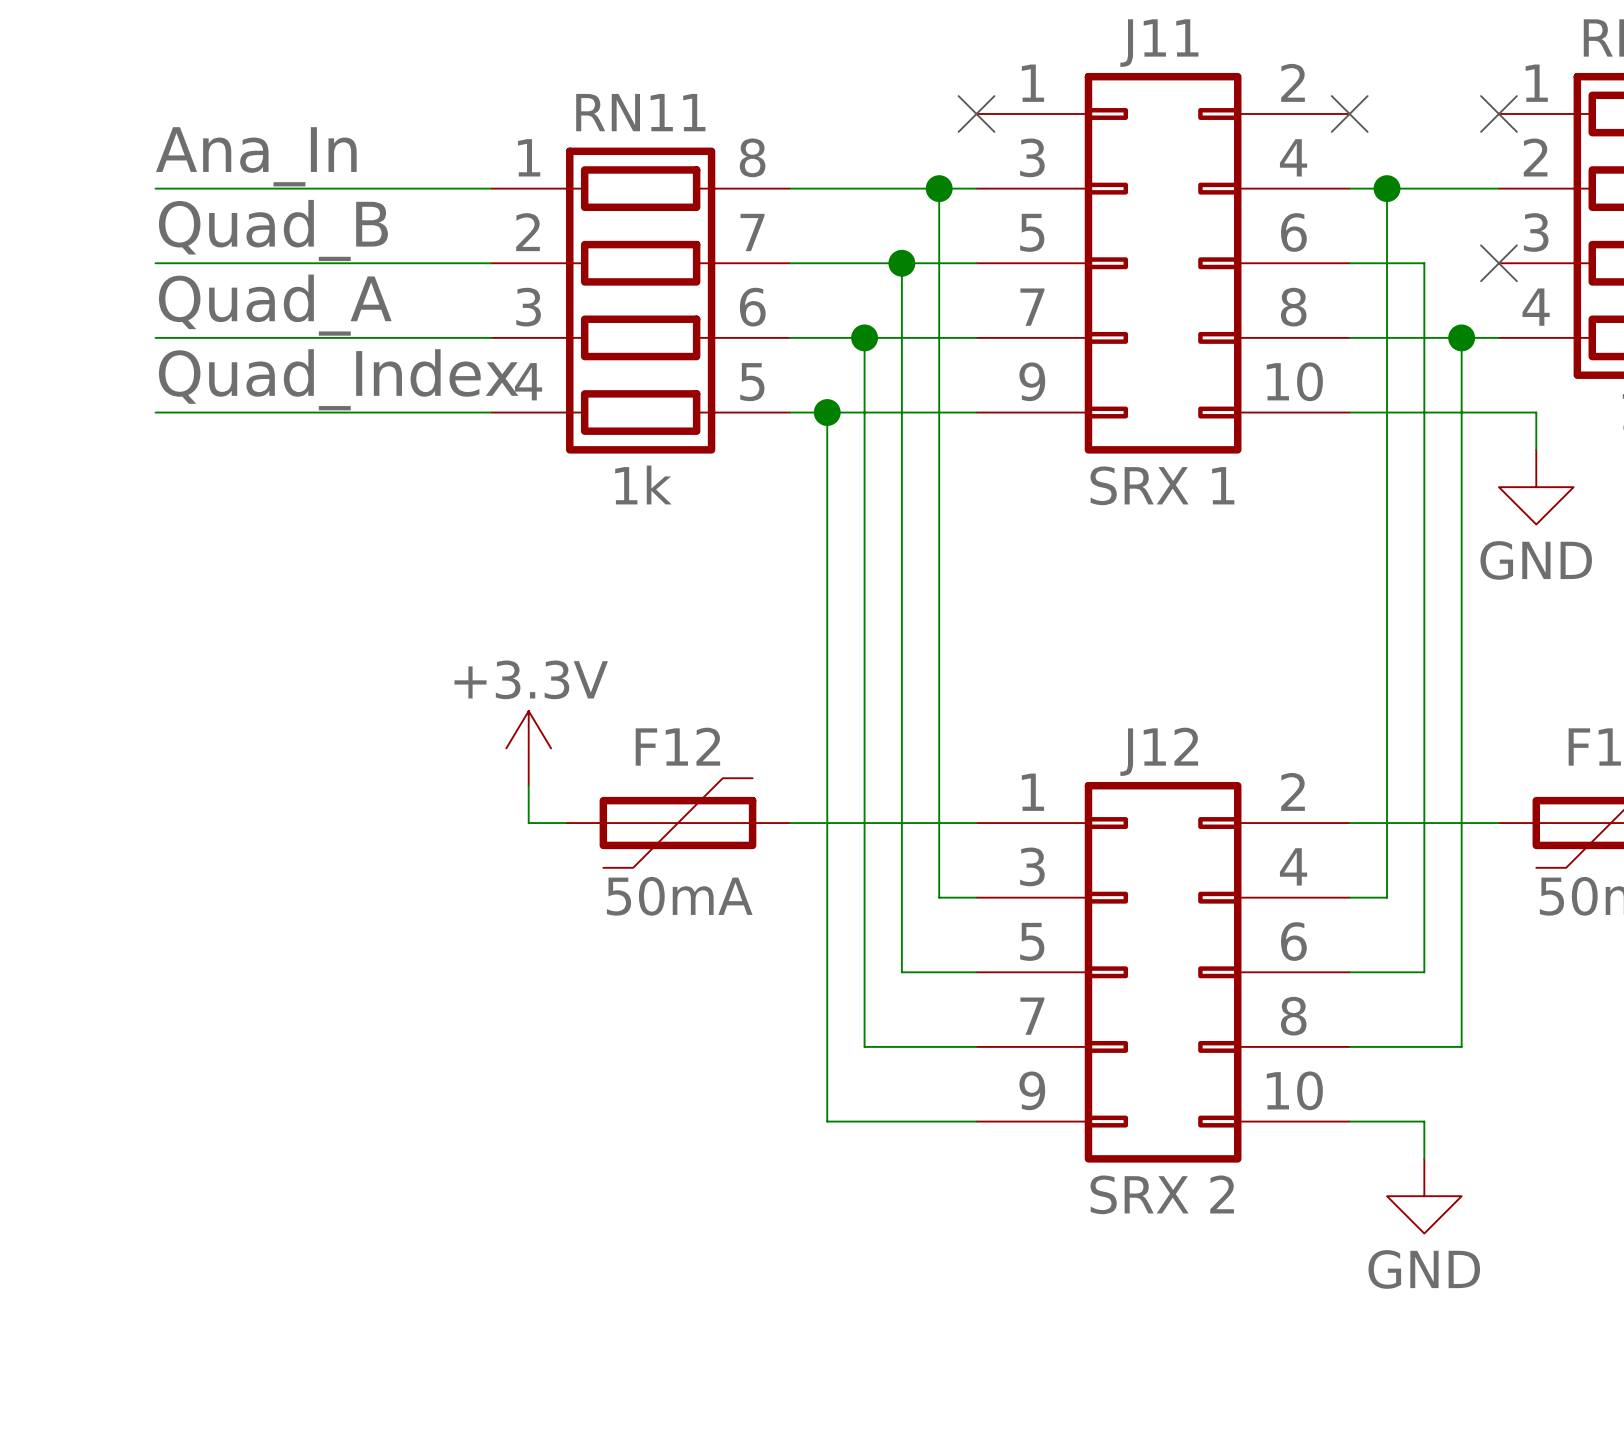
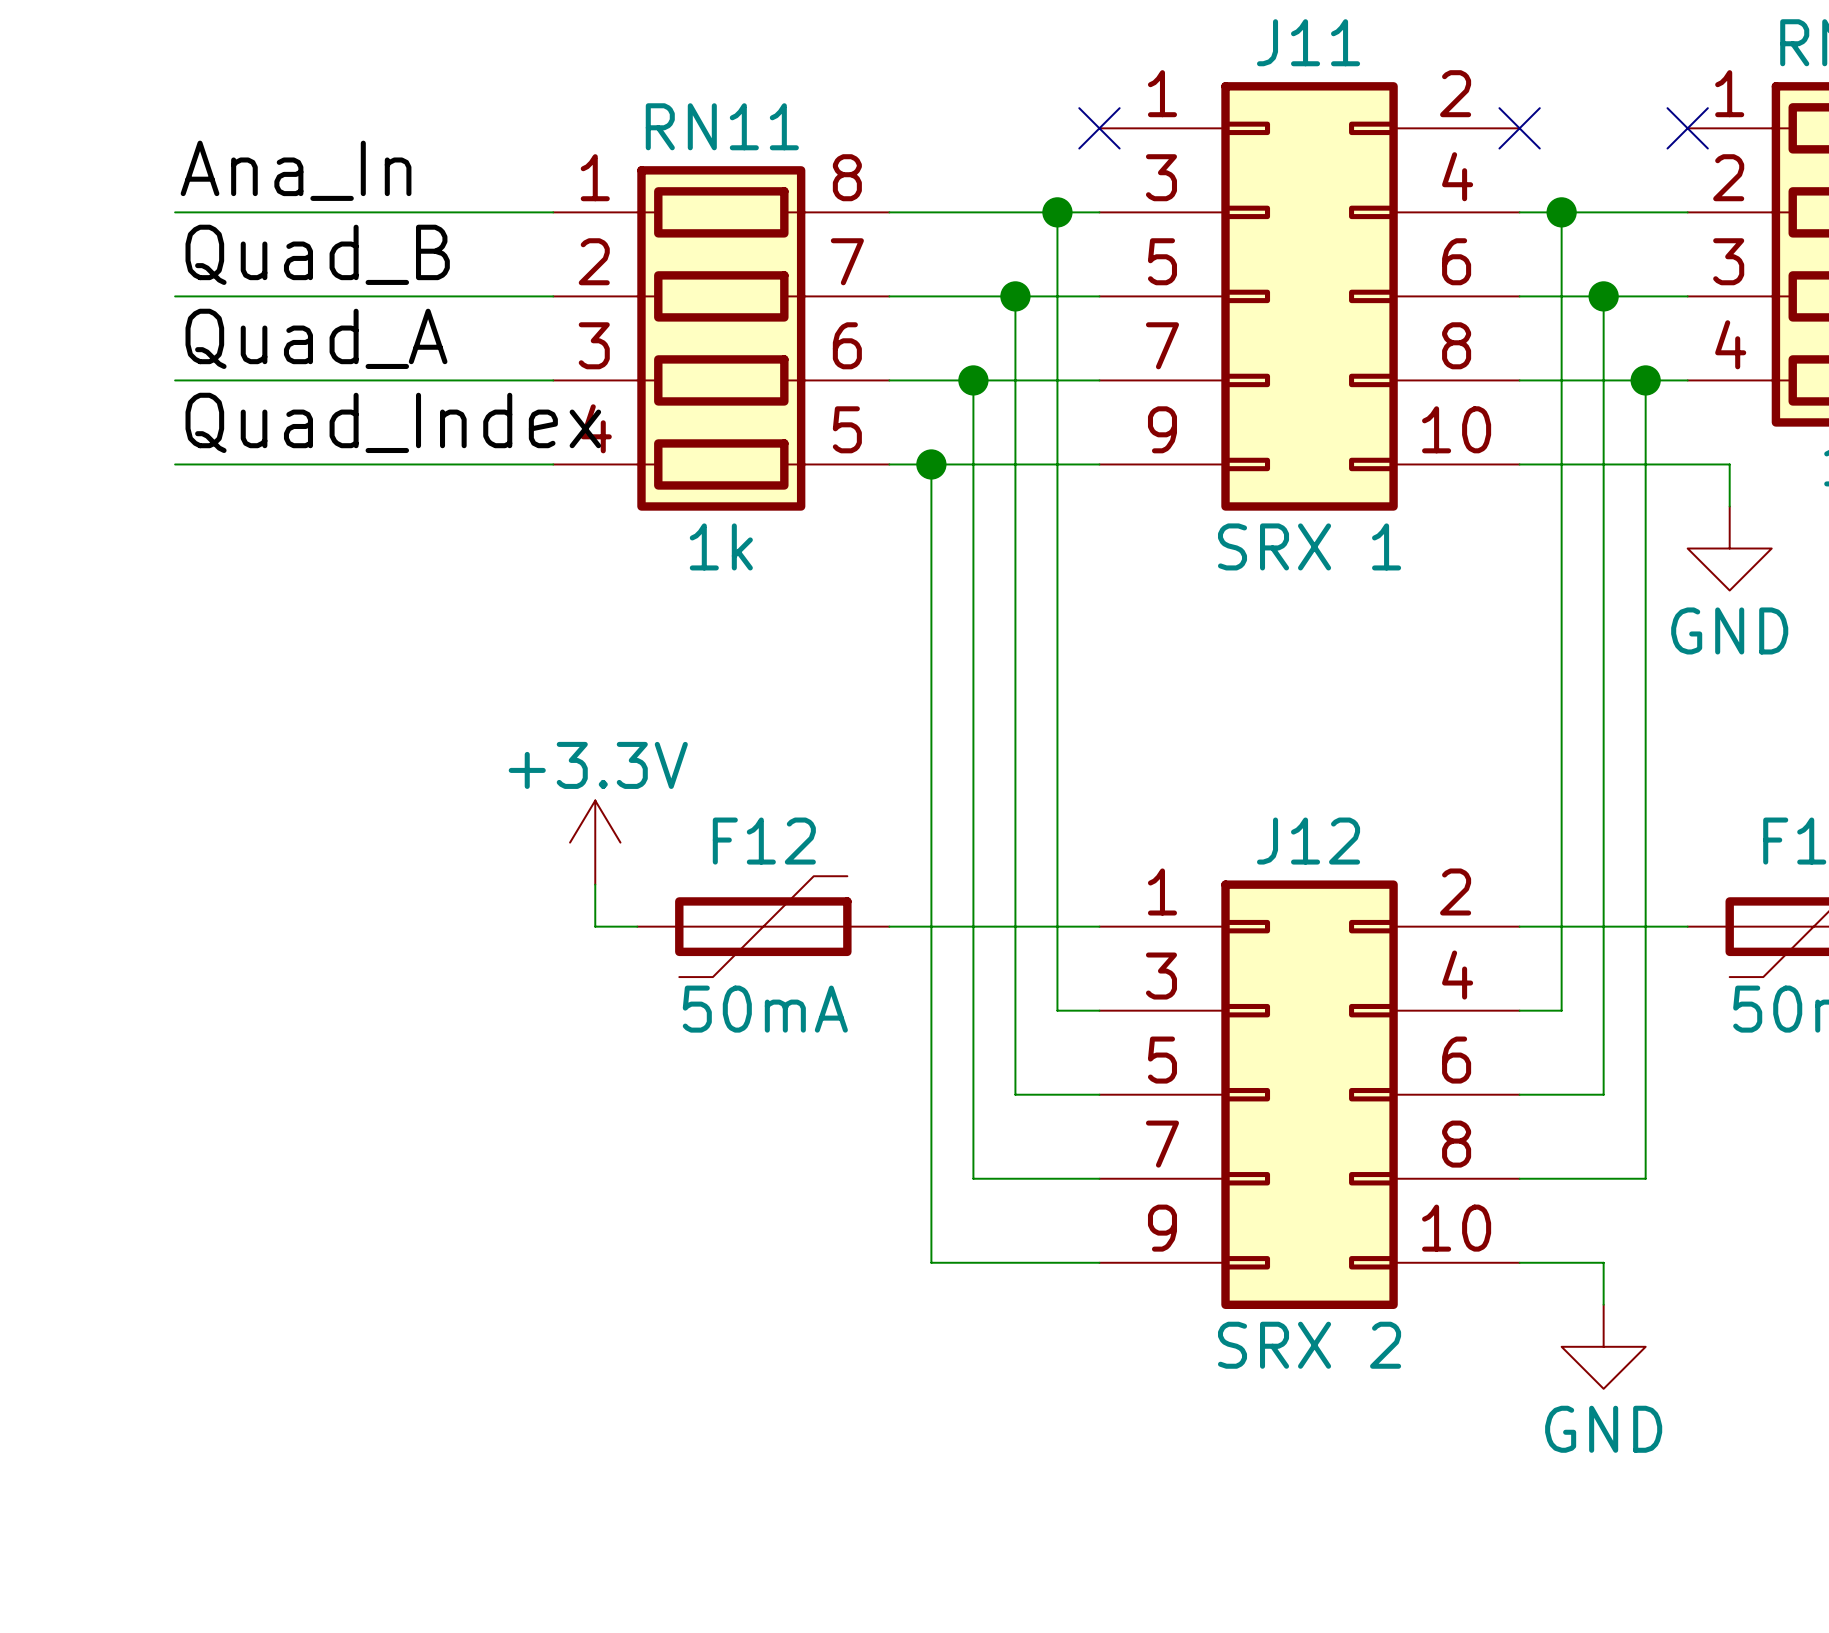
wire: none -> (1603, 296) (1687, 296)
junction: none -> (1603, 296)
no-connect mark: (1498, 263) -> none

